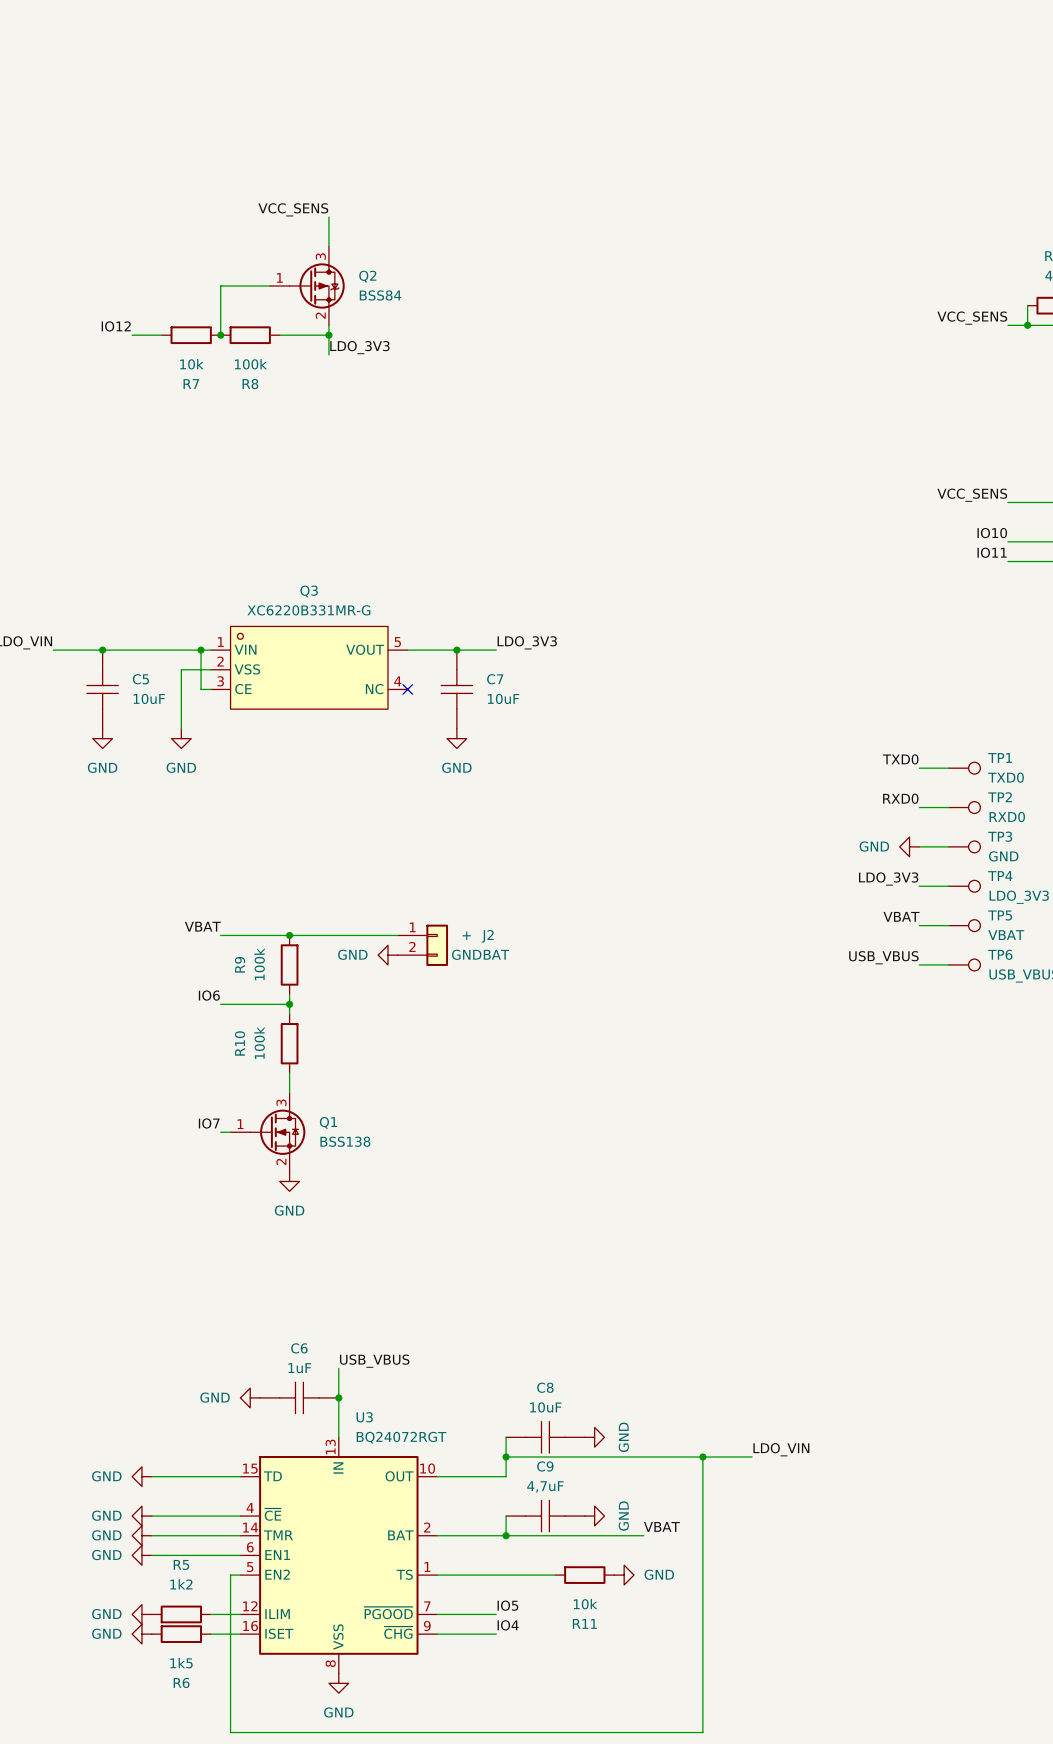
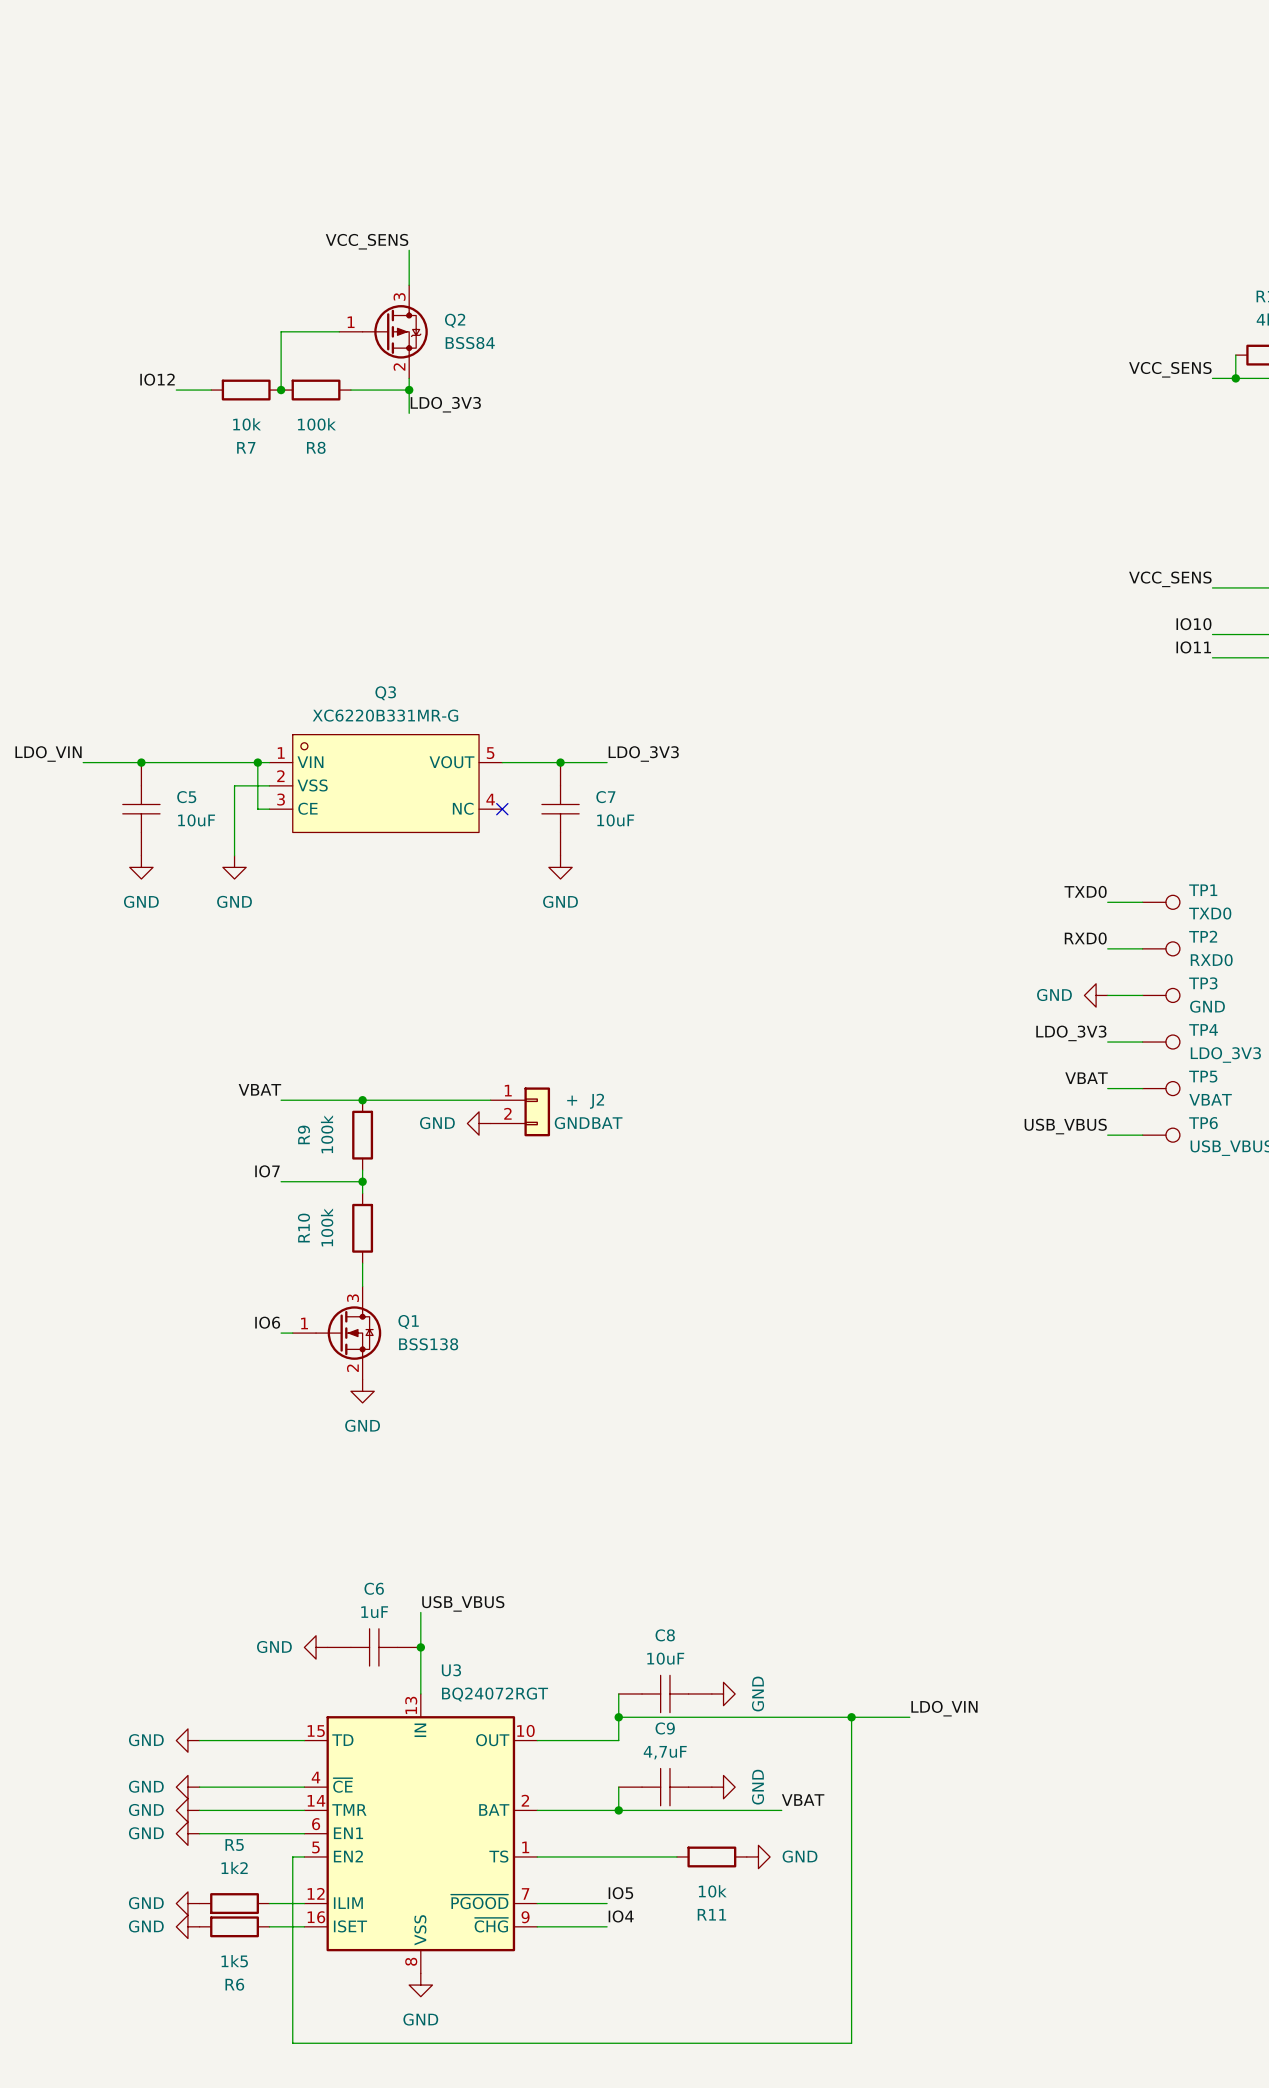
label: IO6 (209, 995) -> IO7 (267, 1171)
label: IO7 (209, 1123) -> IO6 (267, 1322)

